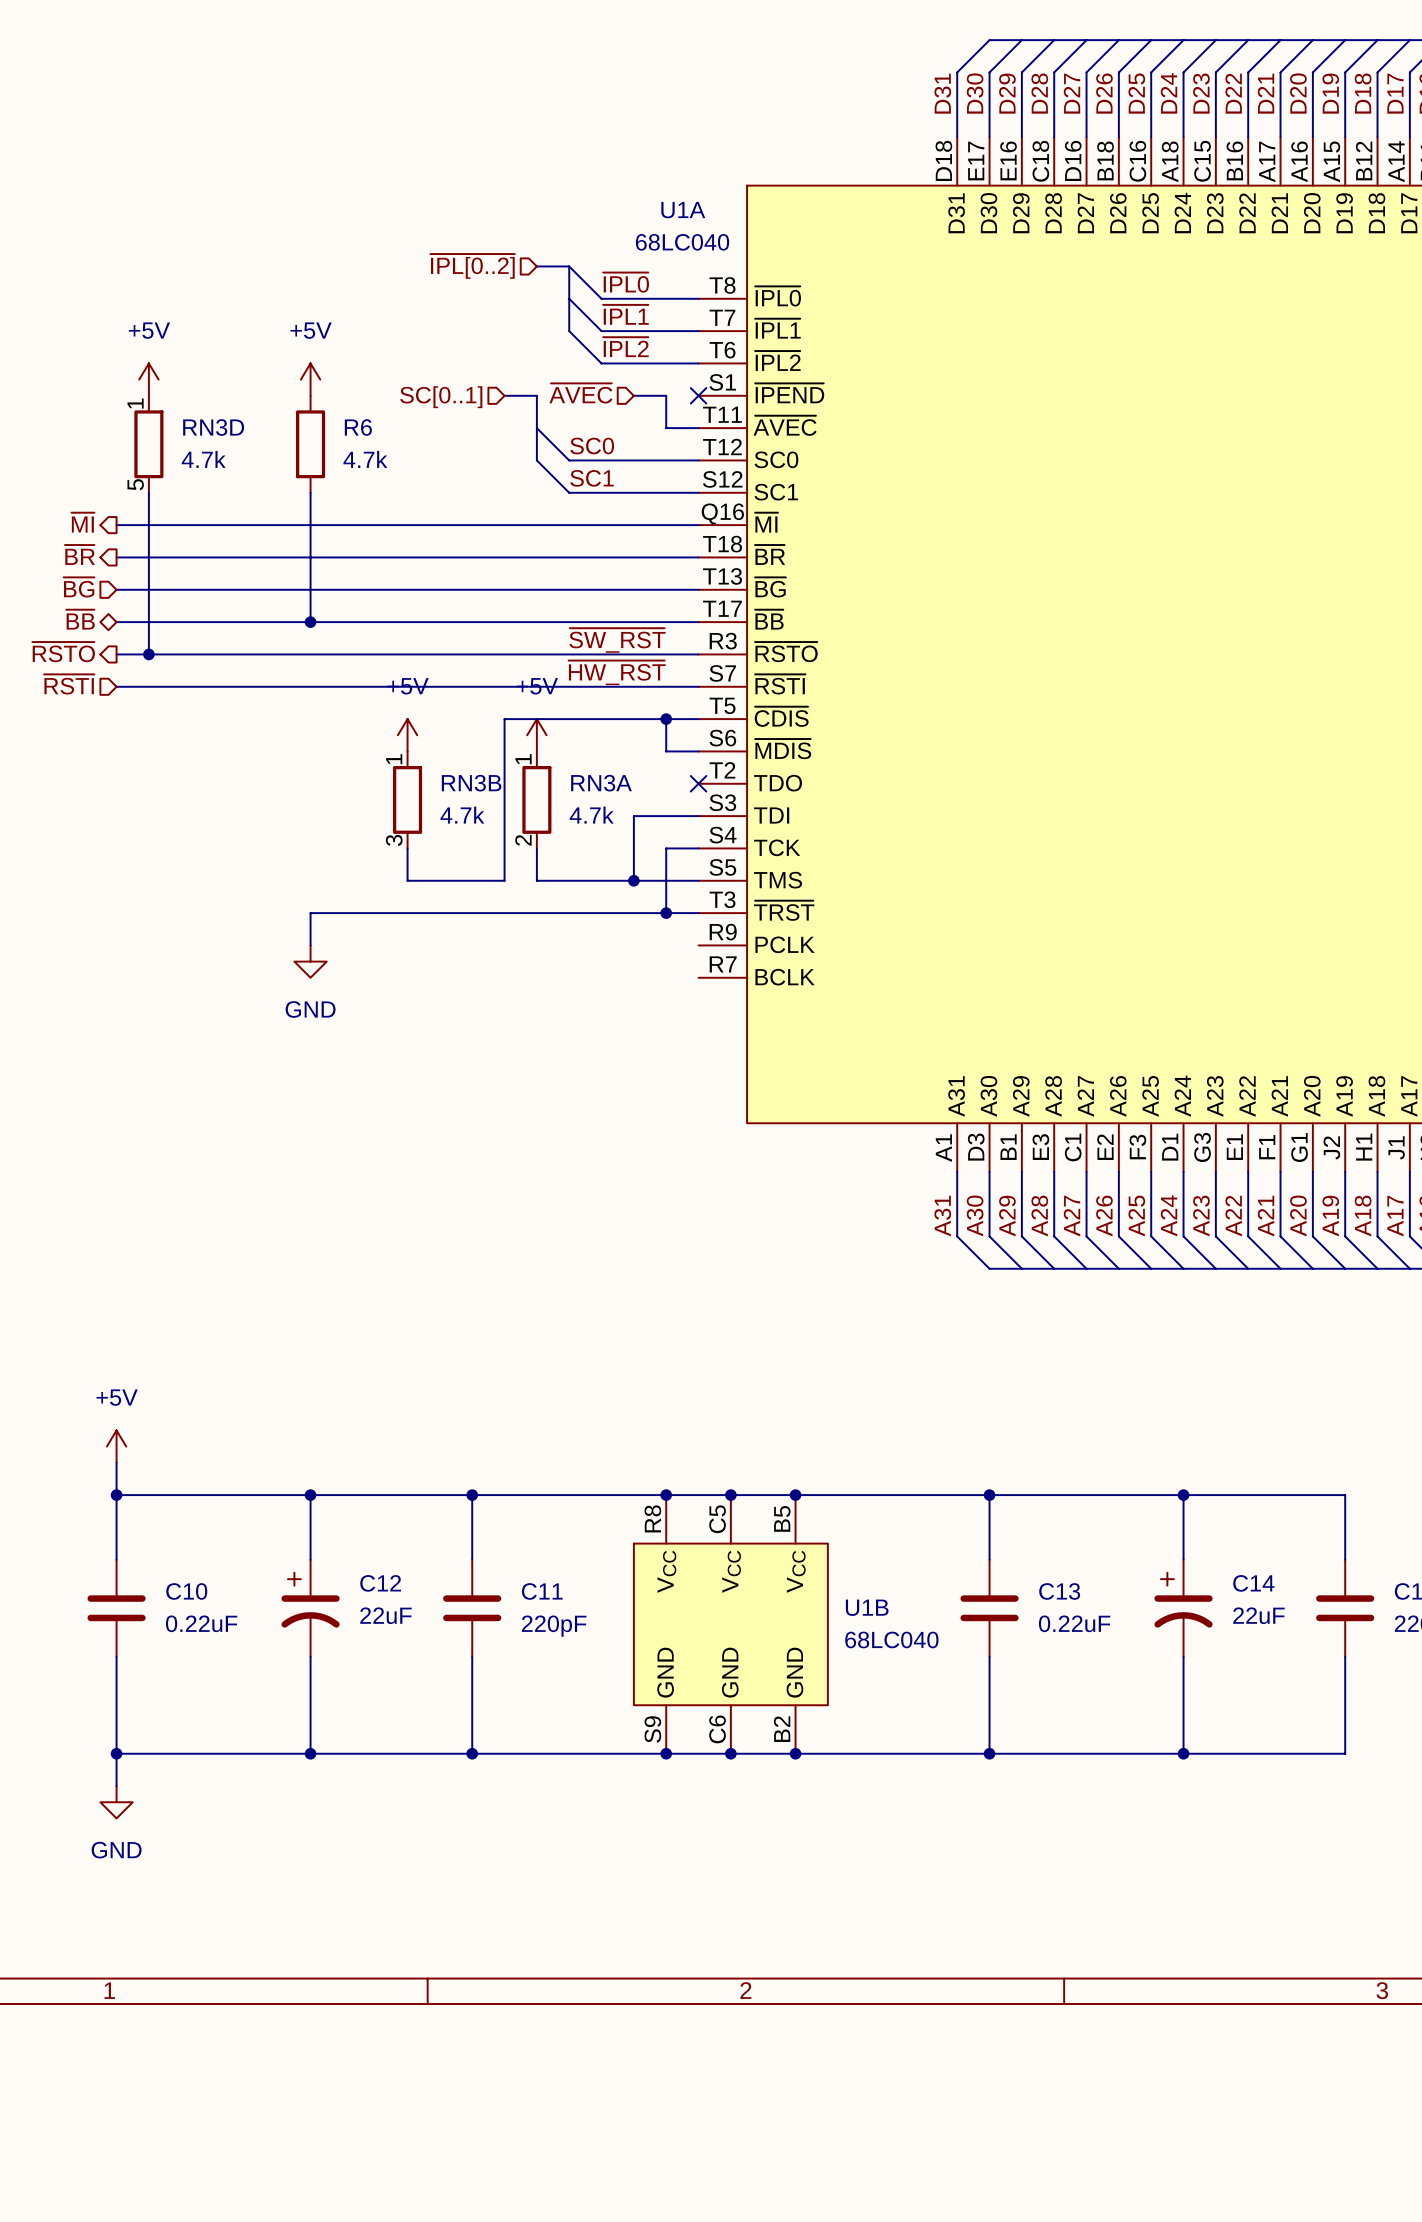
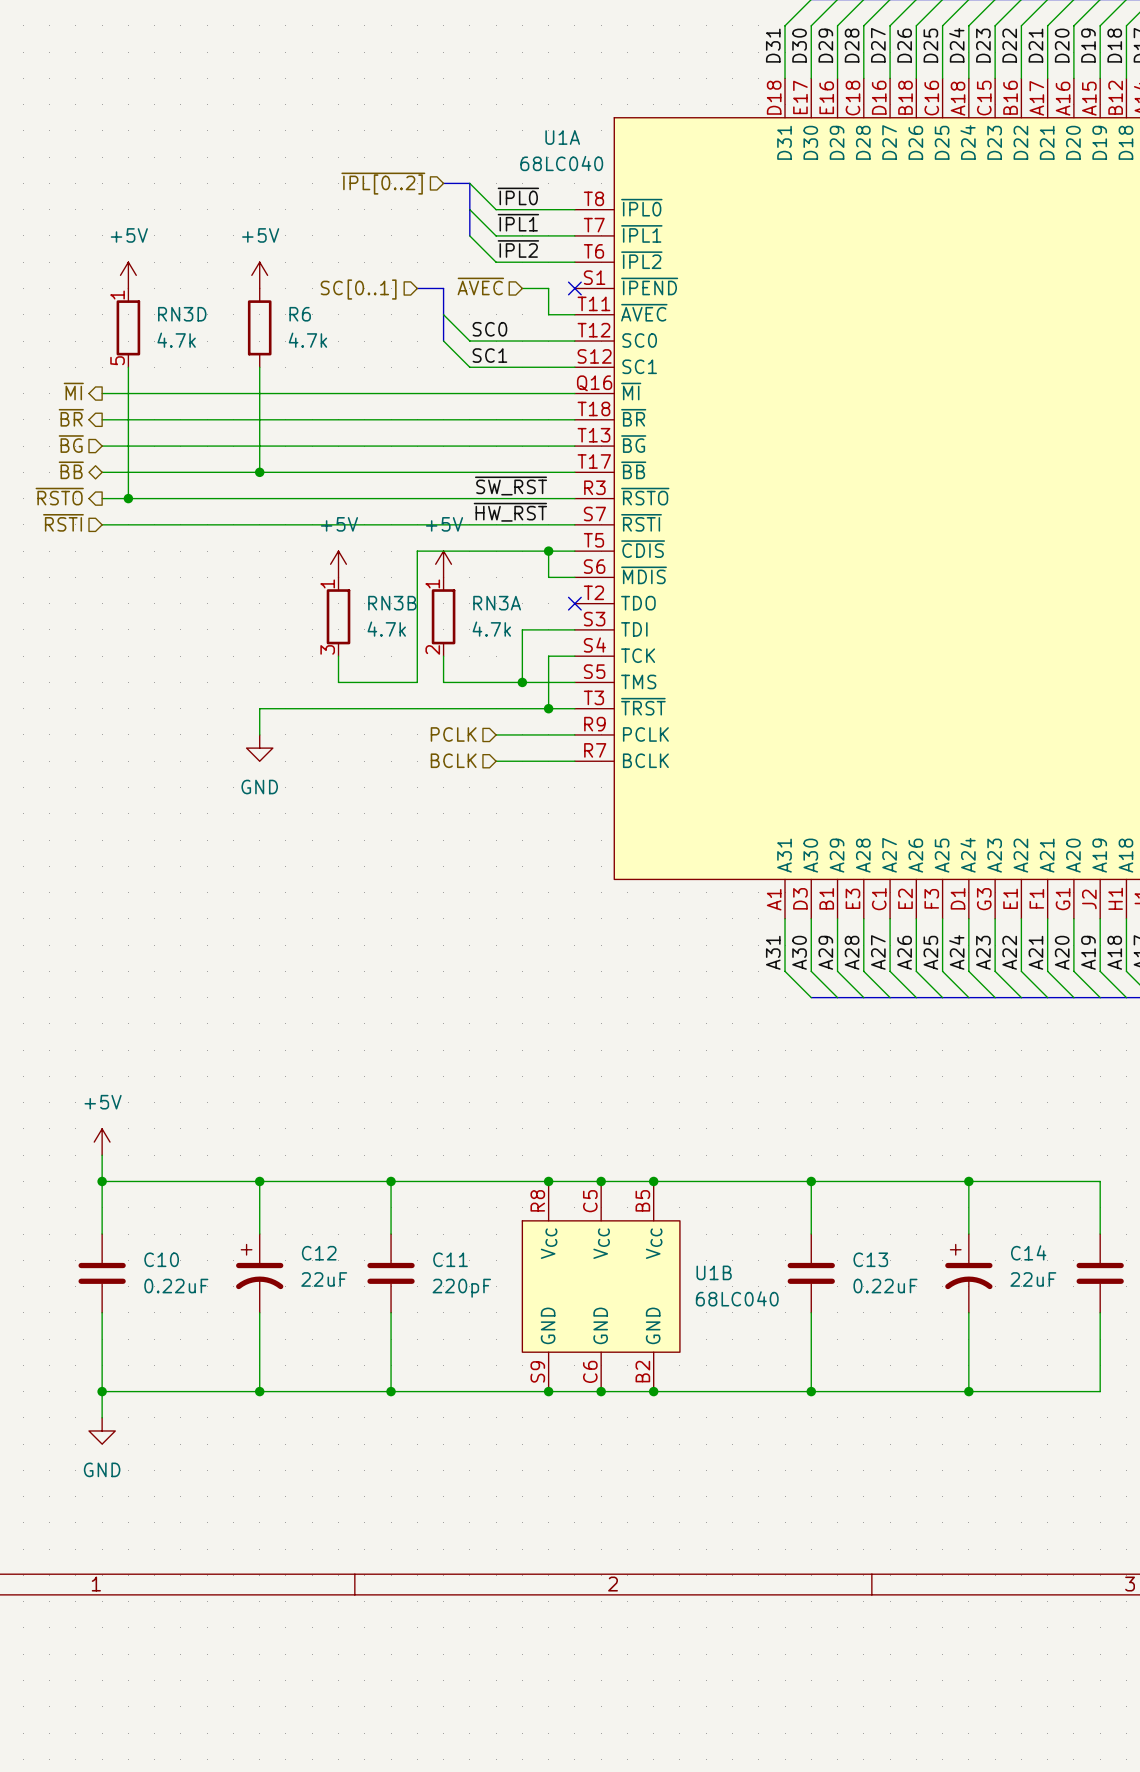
hierarchical label: none -> PCLK (453, 734)
wire: none -> (496, 734) (574, 734)
hierarchical label: none -> BCLK (453, 760)
wire: none -> (496, 761) (574, 761)

